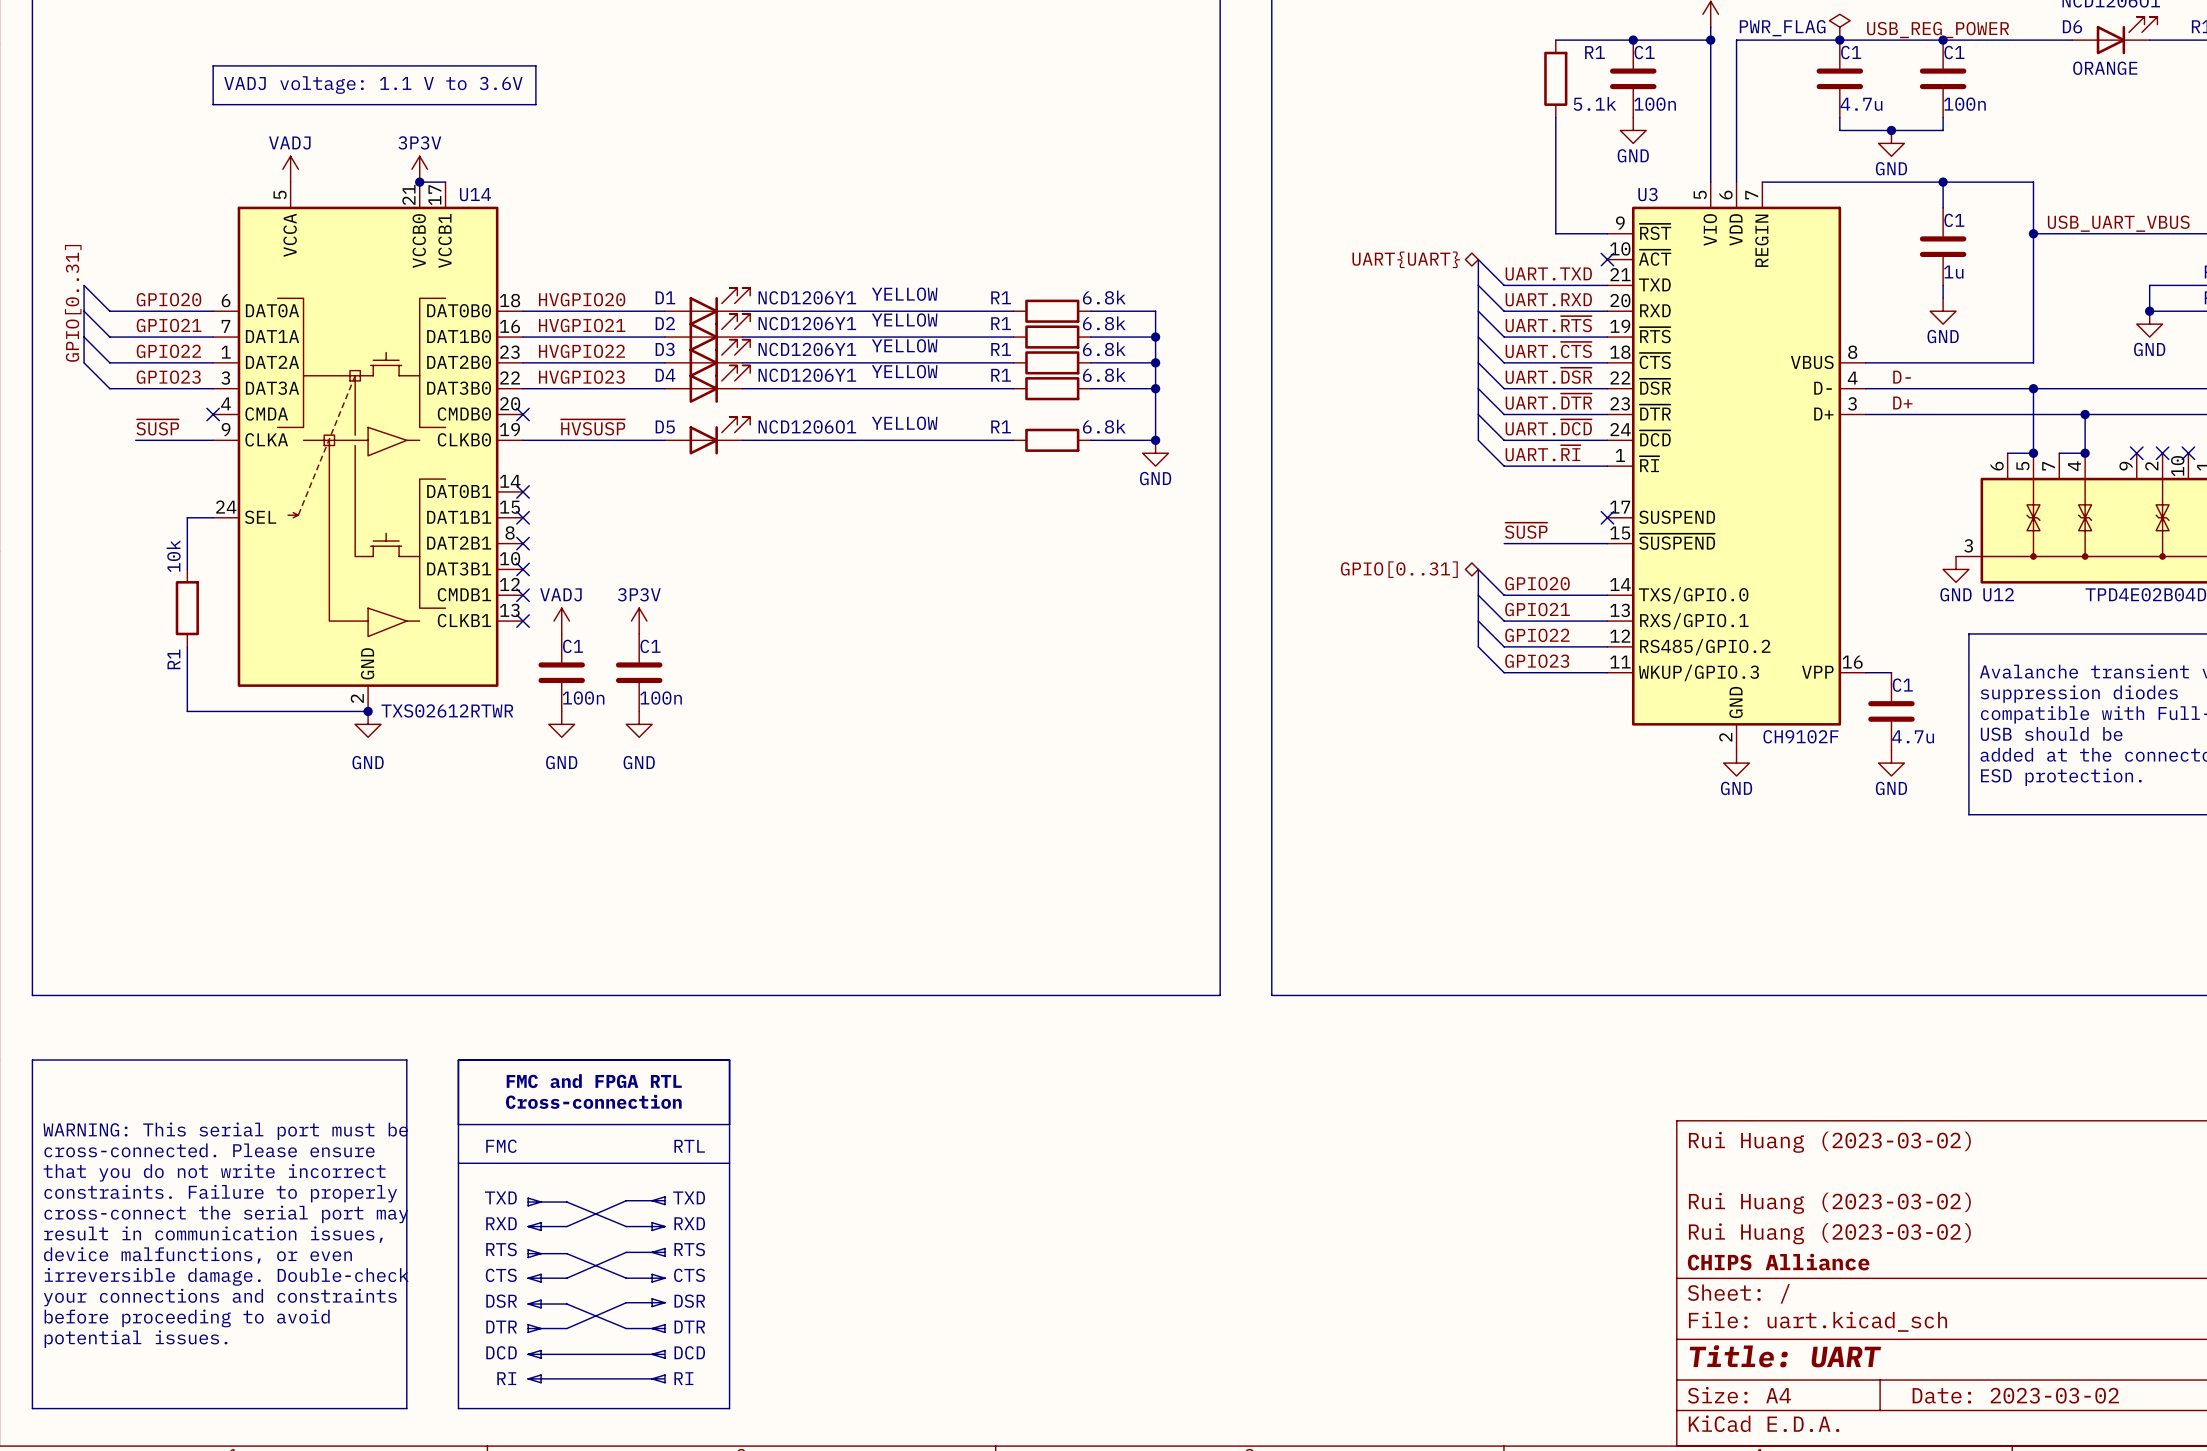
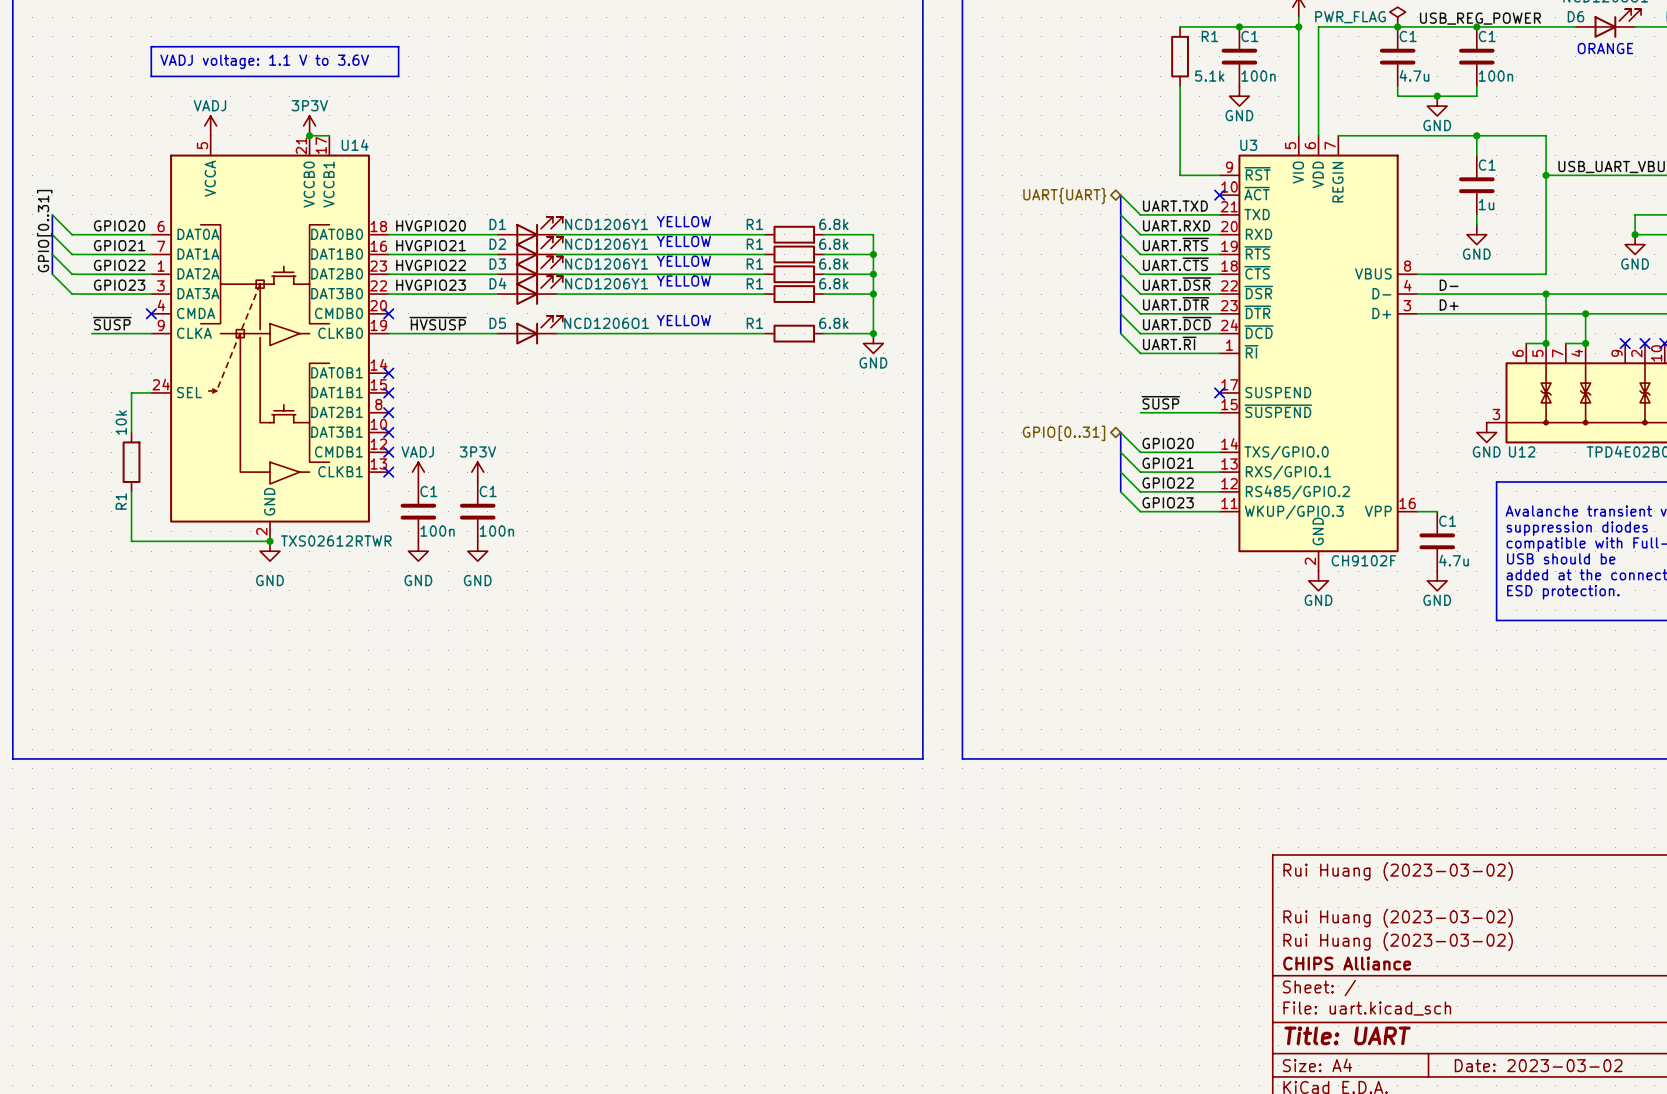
line: (32, 1060) (406, 1060) (406, 1408) (32, 1408) (32, 1060) -> none
line: (458, 1060) (729, 1060) (729, 1408) (458, 1408) (458, 1060) -> none
text: FMC and FPGA RTL (594, 1081) -> none
text: Cross-connection (593, 1101) -> none
line: (458, 1124) (729, 1124) -> none
text: WARNING: This serial port must be (225, 1131) -> none
text: FMC (501, 1146) -> none
text: RTL (689, 1146) -> none
text: cross-connected. Please ensure (209, 1150) -> none
line: (458, 1163) (729, 1163) -> none
text: that you do not write incorrect (214, 1172) -> none
text: constraints. Failure to properly (220, 1193) -> none
line: (665, 1196) (665, 1204) (652, 1200) (665, 1196) -> none
text: TXD (500, 1197) -> none
text: TXD (689, 1197) -> none
line: (528, 1198) (541, 1202) (528, 1205) (528, 1198) -> none
line: (665, 1200) (626, 1200) (566, 1226) (528, 1226) -> none
line: (528, 1202) (566, 1202) (626, 1226) (665, 1226) -> none
text: cross-connect the serial port may (226, 1214) -> none
text: RXD (501, 1223) -> none
text: RXD (689, 1223) -> none
line: (528, 1226) (541, 1230) (541, 1222) (528, 1226) -> none
line: (665, 1226) (652, 1222) (652, 1230) (665, 1226) -> none
text: result in communication issues, (213, 1234) -> none
line: (665, 1248) (665, 1256) (652, 1252) (665, 1248) -> none
text: RTS (501, 1249) -> none
line: (528, 1249) (528, 1257) (541, 1253) (528, 1249) -> none
text: RTS (689, 1249) -> none
line: (665, 1252) (626, 1252) (566, 1278) (528, 1278) -> none
line: (528, 1253) (566, 1253) (626, 1278) (665, 1278) -> none
text: device malfunctions, or even (197, 1255) -> none
text: CTS (501, 1275) -> none
text: CTS (689, 1275) -> none
text: irreversible damage. Double-check (226, 1276) -> none
line: (528, 1278) (541, 1274) (541, 1282) (528, 1278) -> none
line: (665, 1278) (652, 1274) (652, 1282) (665, 1278) -> none
text: your connections and constraints (220, 1297) -> none
text: DSR (501, 1301) -> none
text: DSR (689, 1301) -> none
line: (665, 1302) (652, 1298) (652, 1306) (665, 1302) -> none
line: (665, 1302) (626, 1302) (566, 1328) (528, 1328) -> none
line: (528, 1304) (541, 1307) (541, 1300) (528, 1304) -> none
line: (528, 1304) (566, 1304) (626, 1328) (665, 1328) -> none
text: before proceeding to avoid (187, 1318) -> none
line: (528, 1324) (528, 1332) (541, 1328) (528, 1324) -> none
line: (665, 1324) (665, 1332) (652, 1328) (665, 1324) -> none
text: DTR (501, 1327) -> none
text: DTR (689, 1327) -> none
text: potential issues. (135, 1339) -> none
line: (665, 1350) (665, 1358) (652, 1354) (665, 1350) -> none
text: DCD (501, 1352) -> none
text: DCD (689, 1352) -> none
line: (528, 1354) (541, 1350) (541, 1358) (528, 1354) -> none
line: (528, 1354) (663, 1354) -> none
line: (665, 1375) (665, 1382) (652, 1378) (665, 1375) -> none
text: RI (506, 1378) -> none
line: (528, 1378) (541, 1375) (541, 1382) (528, 1378) -> none
line: (528, 1378) (663, 1378) -> none
text: RI (683, 1378) -> none

